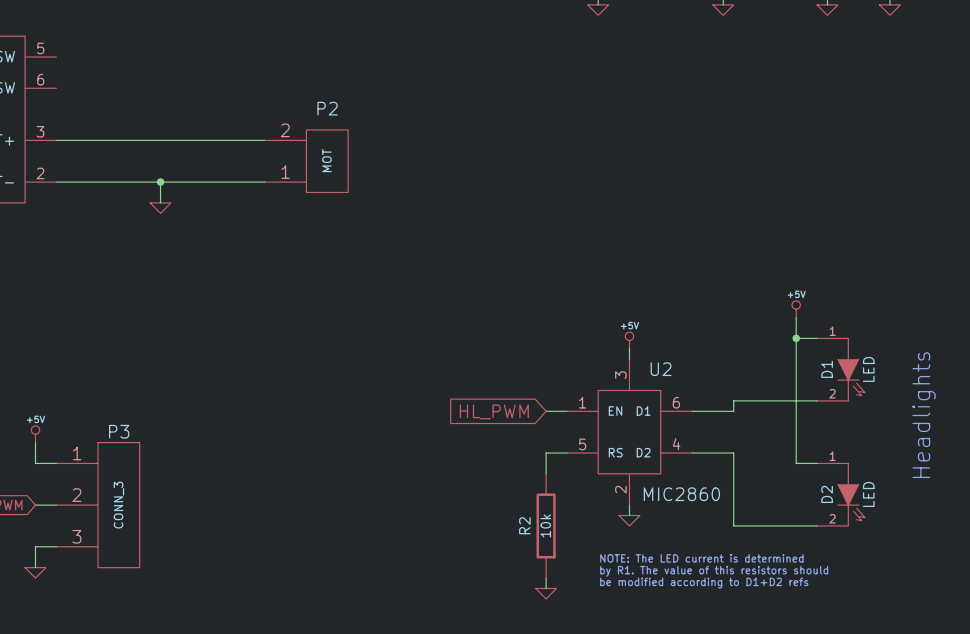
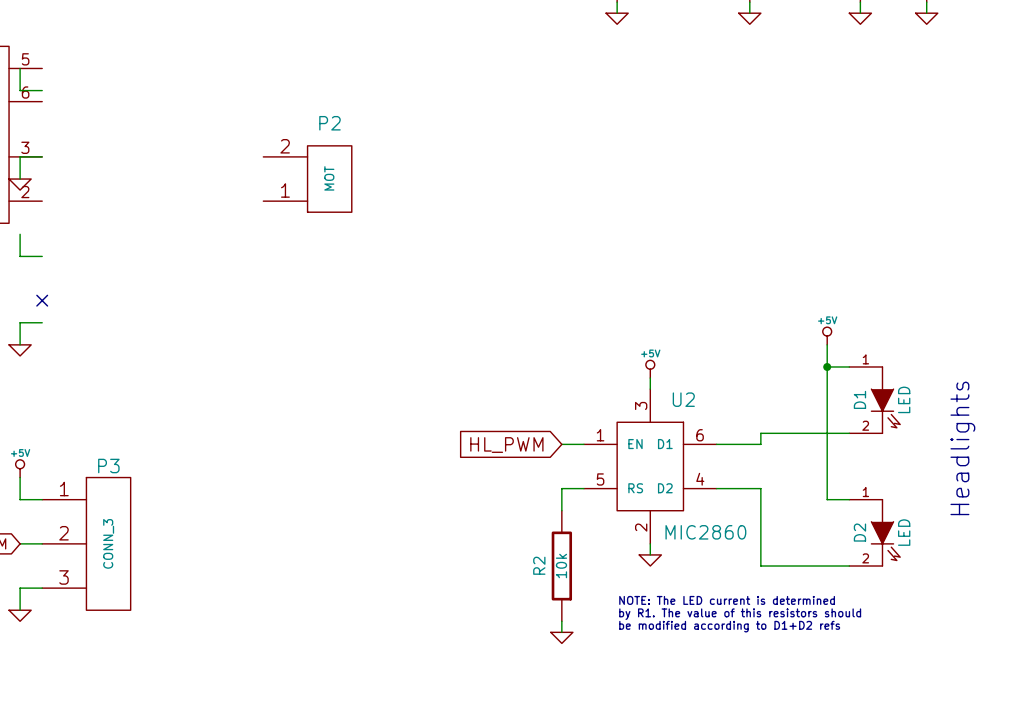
wire: none -> (20, 68) (20, 90) (42, 90)
wire: (56, 140) (264, 140) -> (42, 156) (20, 156) (20, 179)
power symbol: none -> (20, 184)
wire: (56, 182) (264, 182) -> none
wire: (160, 182) (160, 202) -> none
junction: (160, 182) -> none
power symbol: (160, 208) -> none
wire: none -> (20, 234) (20, 256) (42, 256)
no-connect mark: none -> (42, 300)
wire: none -> (42, 322) (20, 322) (20, 344)
power symbol: none -> (20, 350)

